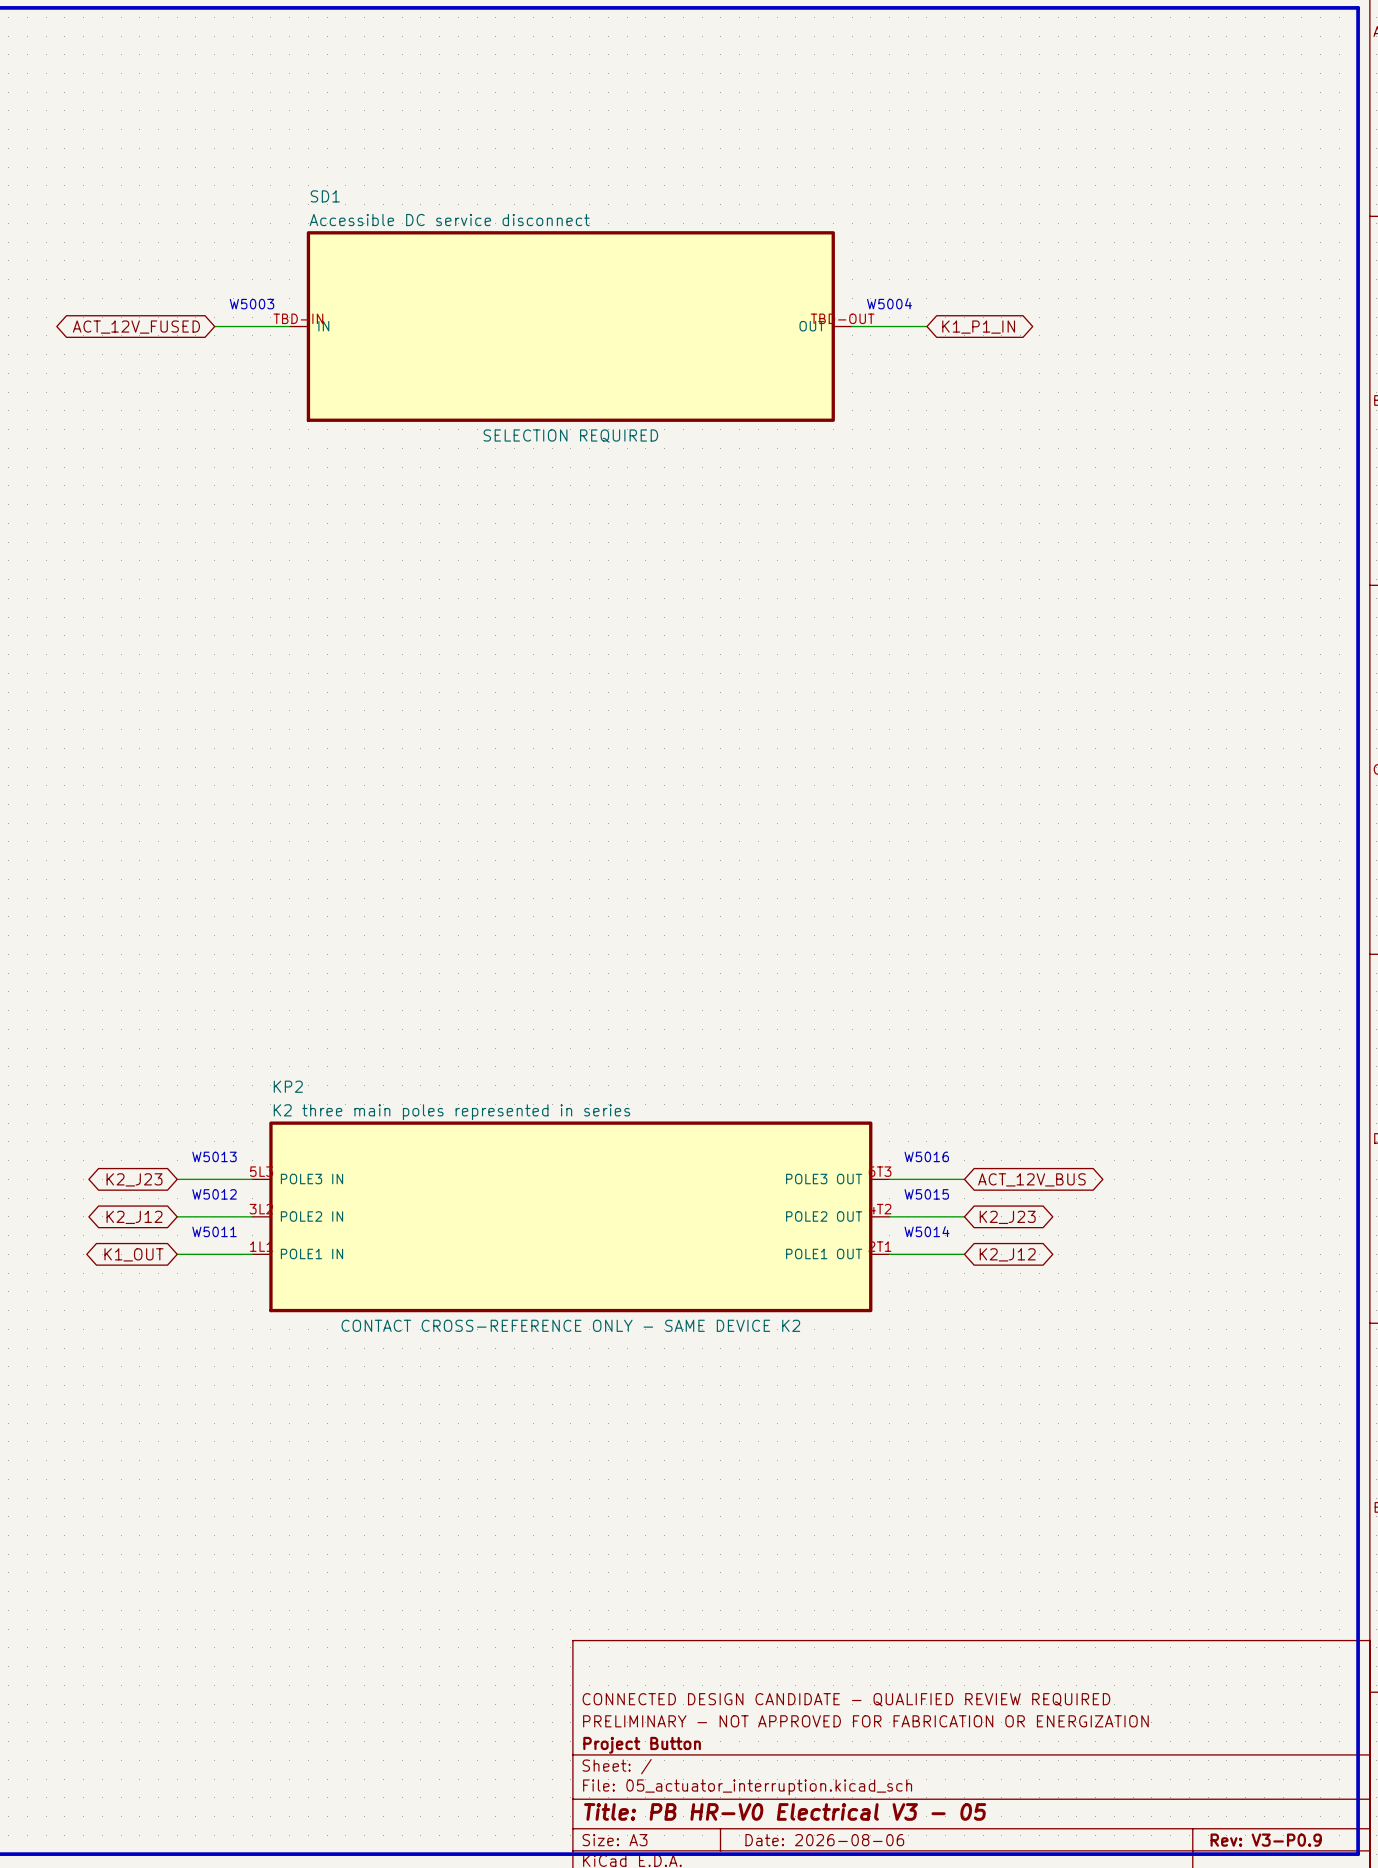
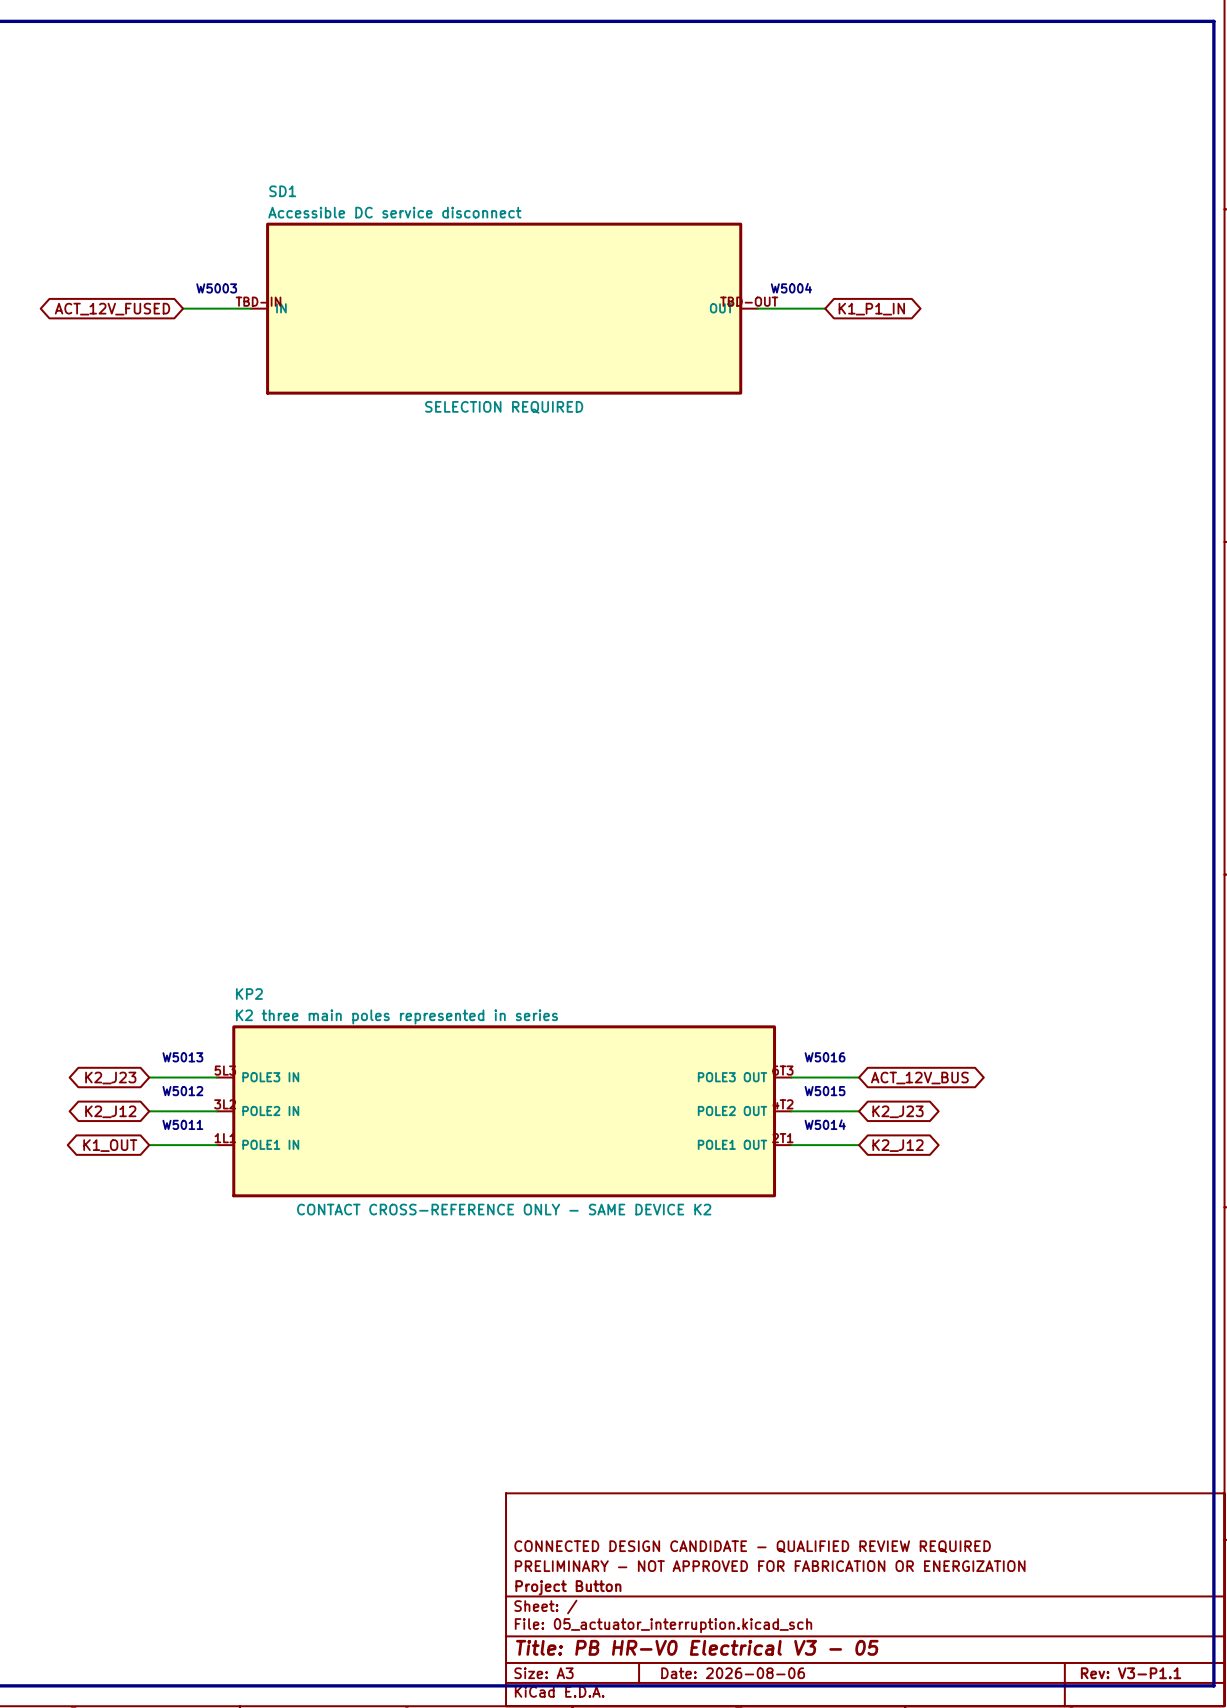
title block: Rev: V3-P0.9 (1266, 1840) -> Rev: V3-P1.1 (1131, 1673)

